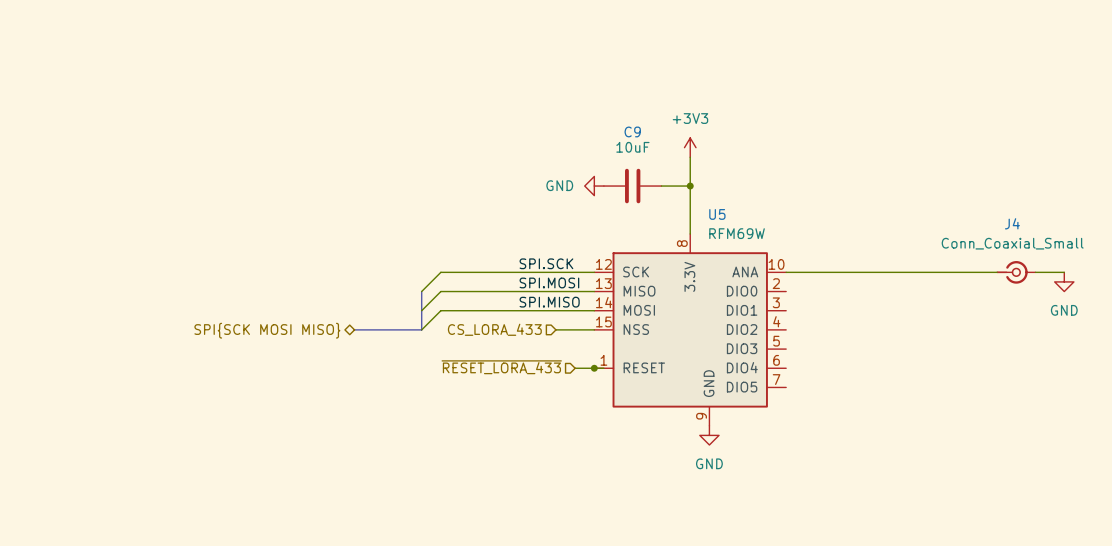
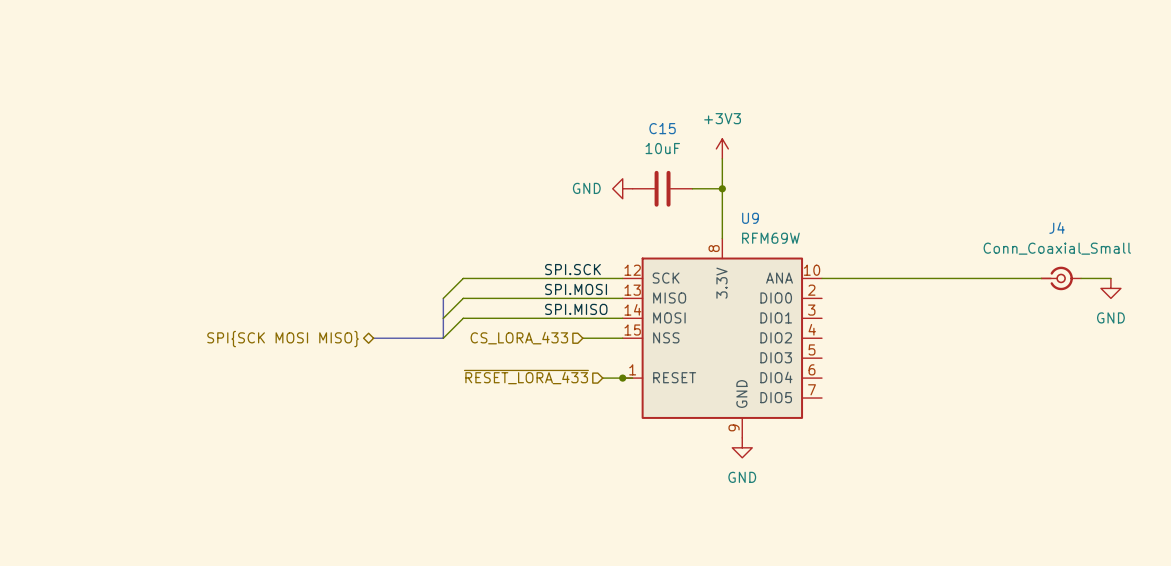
C9 name: C9 (632, 131) -> C15 (662, 128)
U5 name: U5 (717, 214) -> U9 (750, 218)

